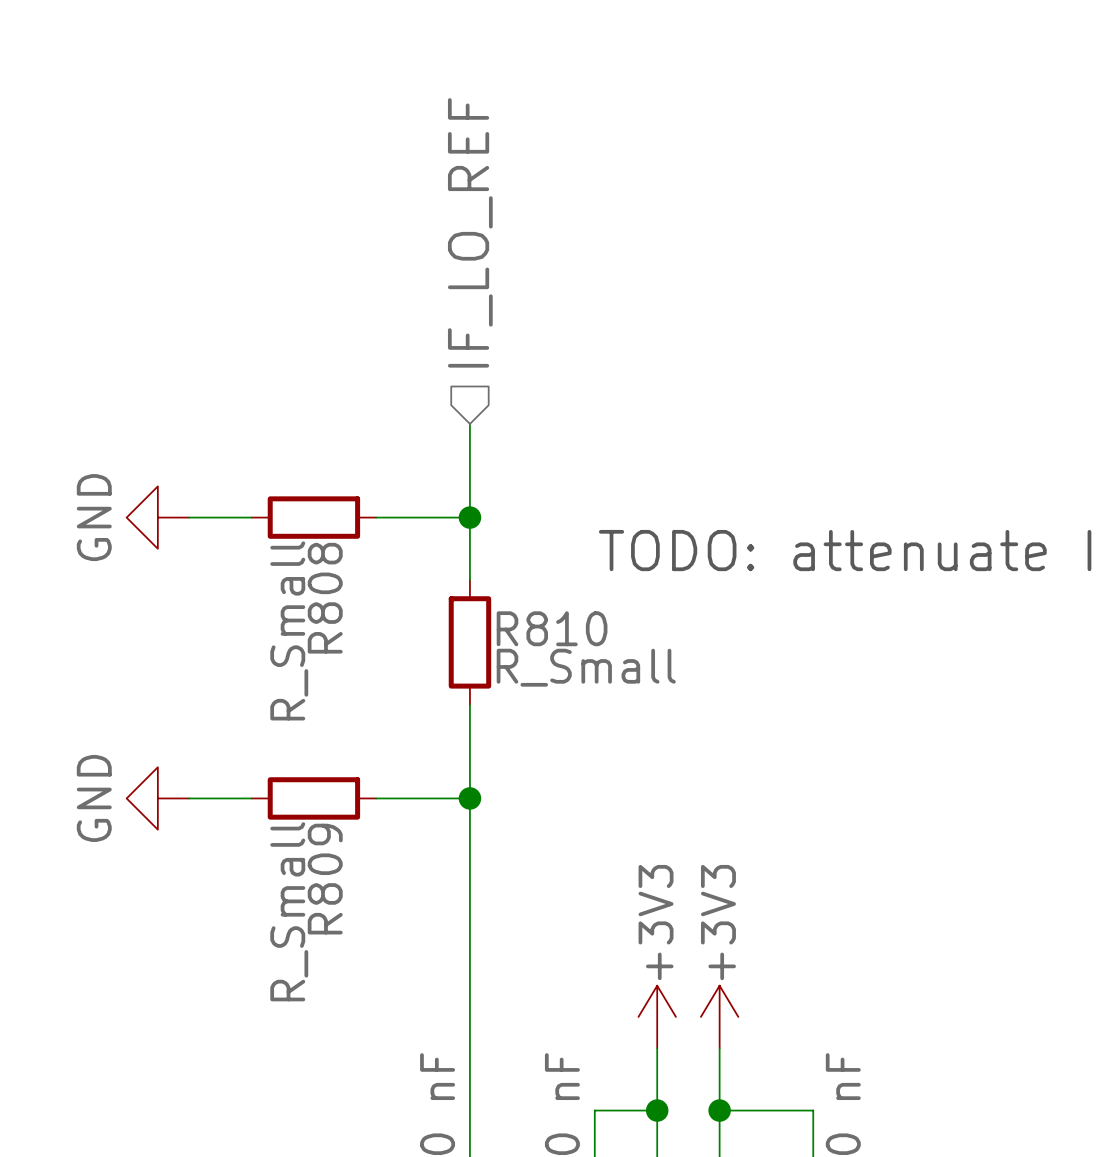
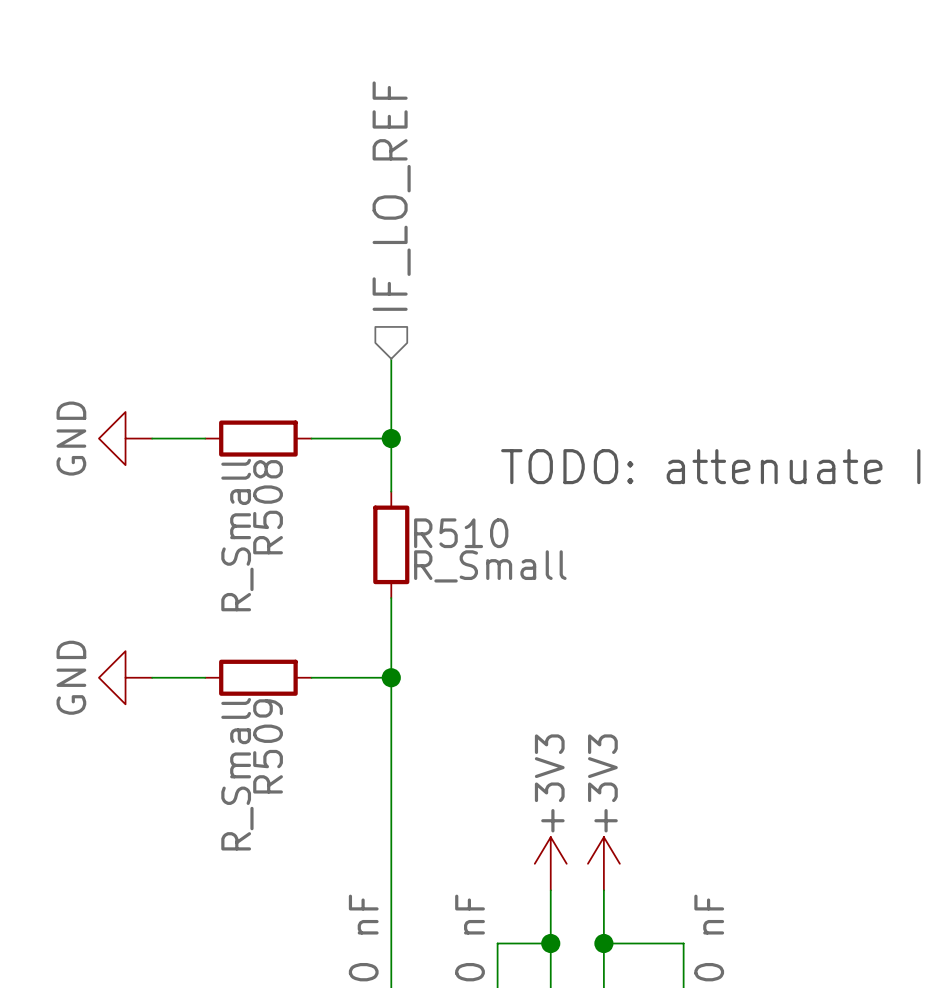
R808 name: R808 (325, 598) -> R508 (268, 507)
R810 name: R810 (552, 628) -> R510 (461, 533)
R809 name: R809 (325, 879) -> R509 (268, 746)

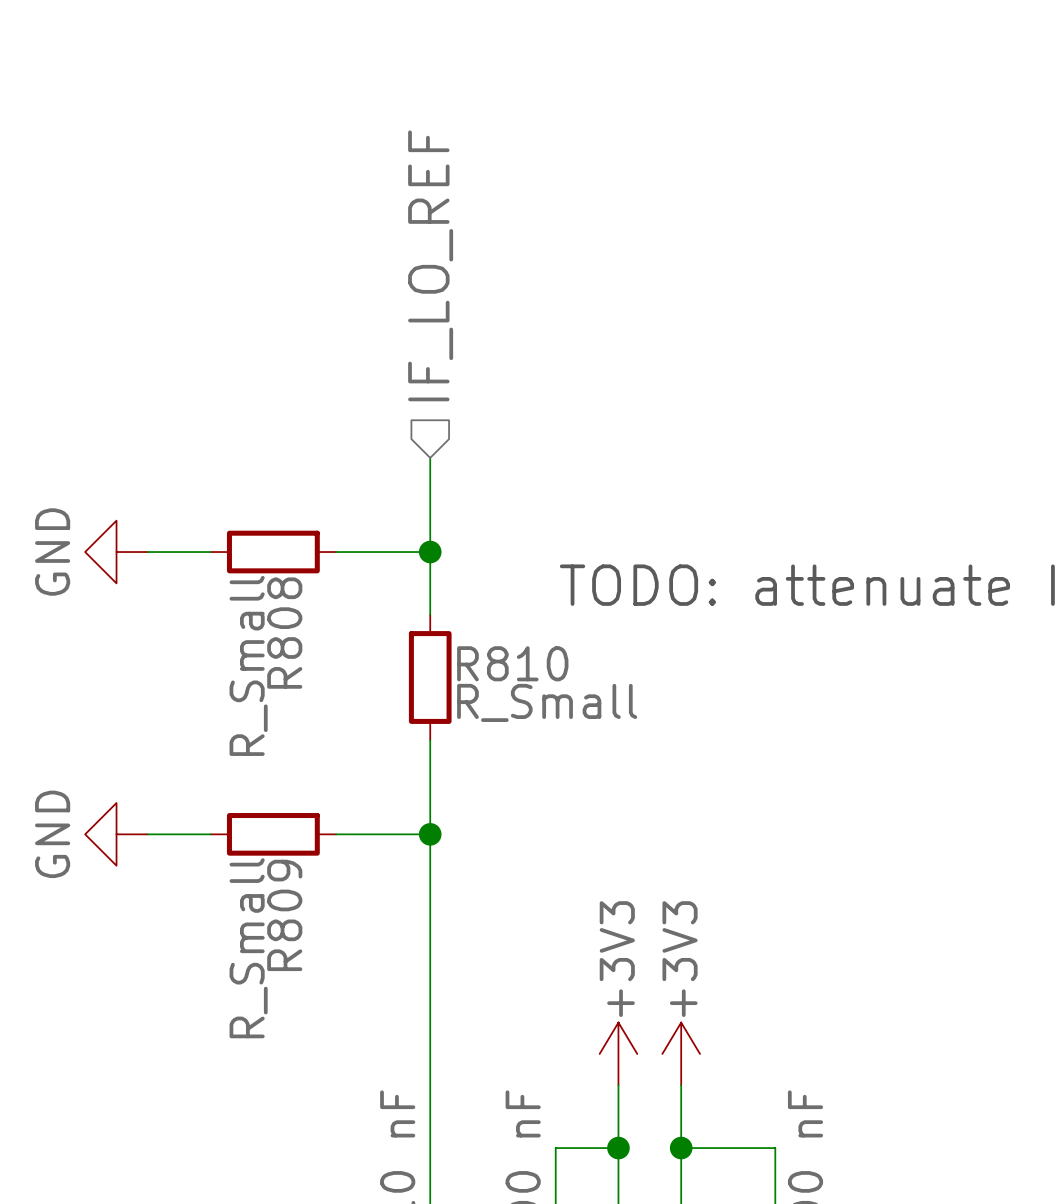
R508 name: R508 (268, 507) -> R808 (284, 633)
R510 name: R510 (461, 533) -> R810 (512, 663)
R509 name: R509 (268, 746) -> R809 (284, 915)

